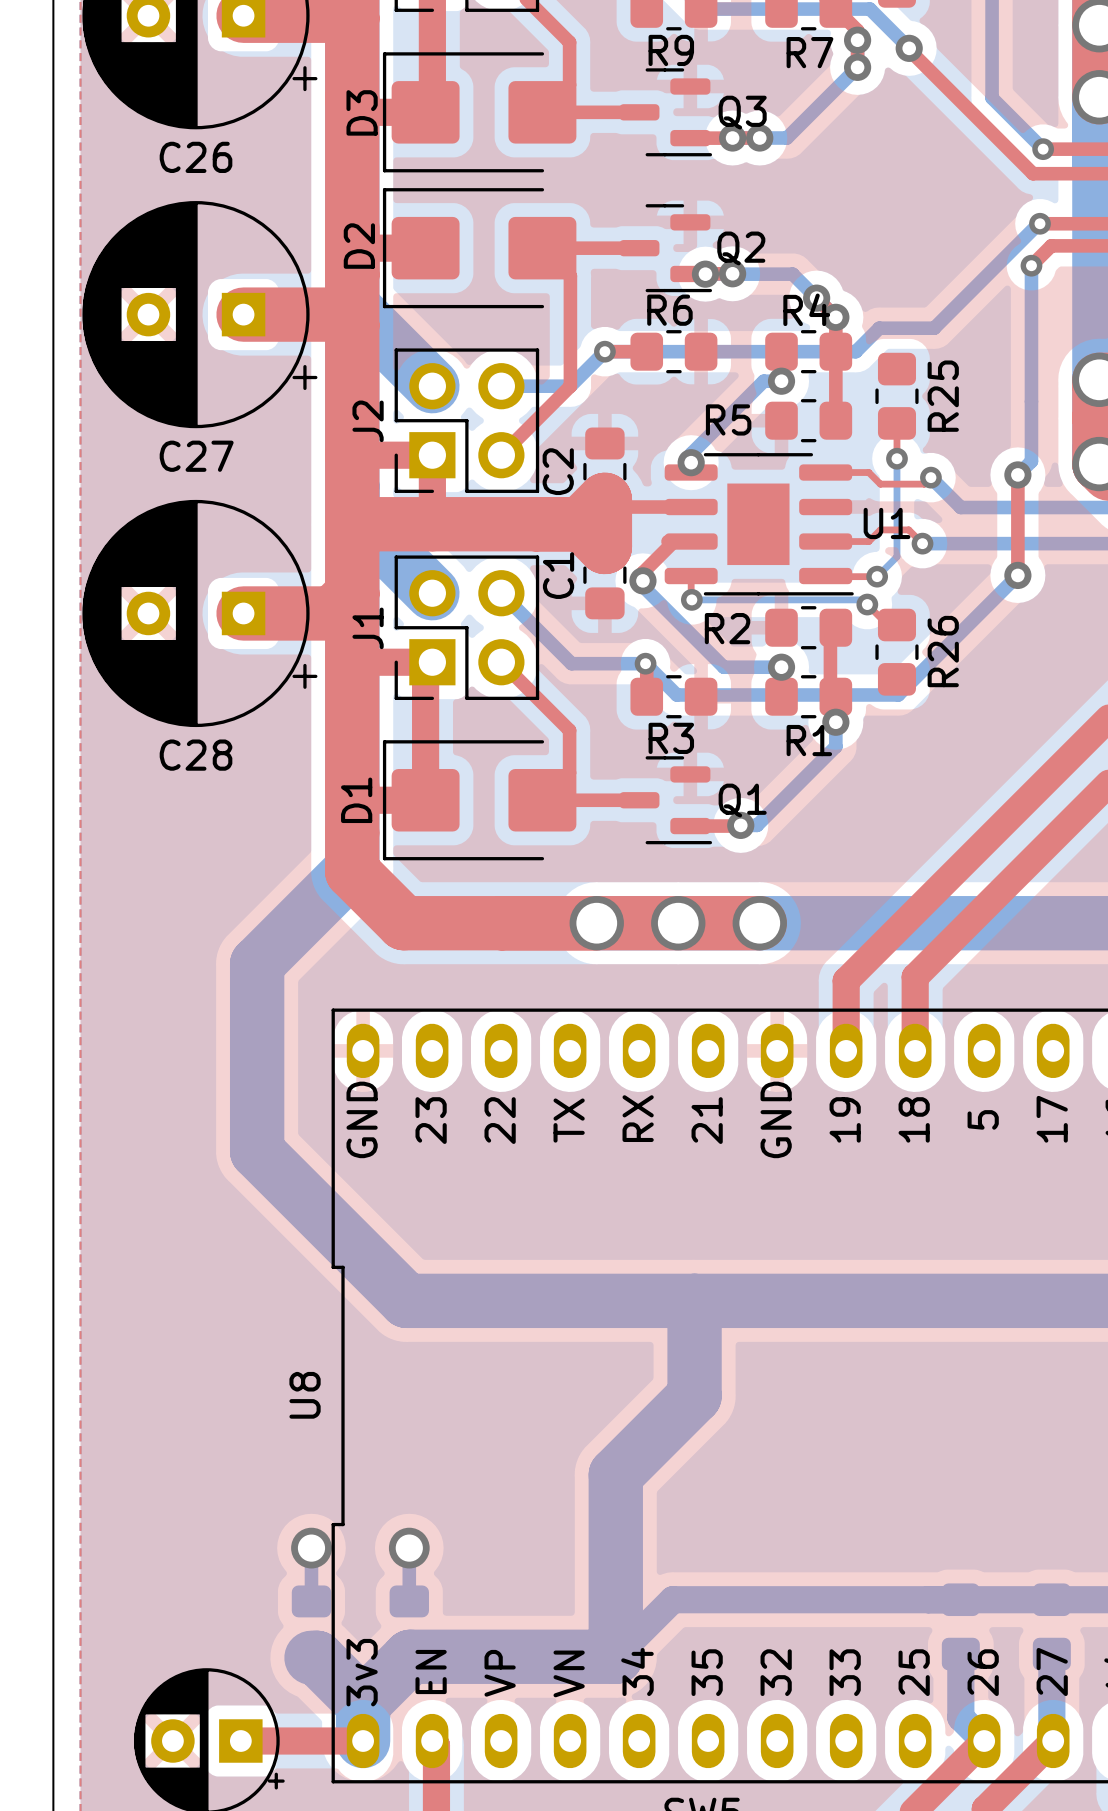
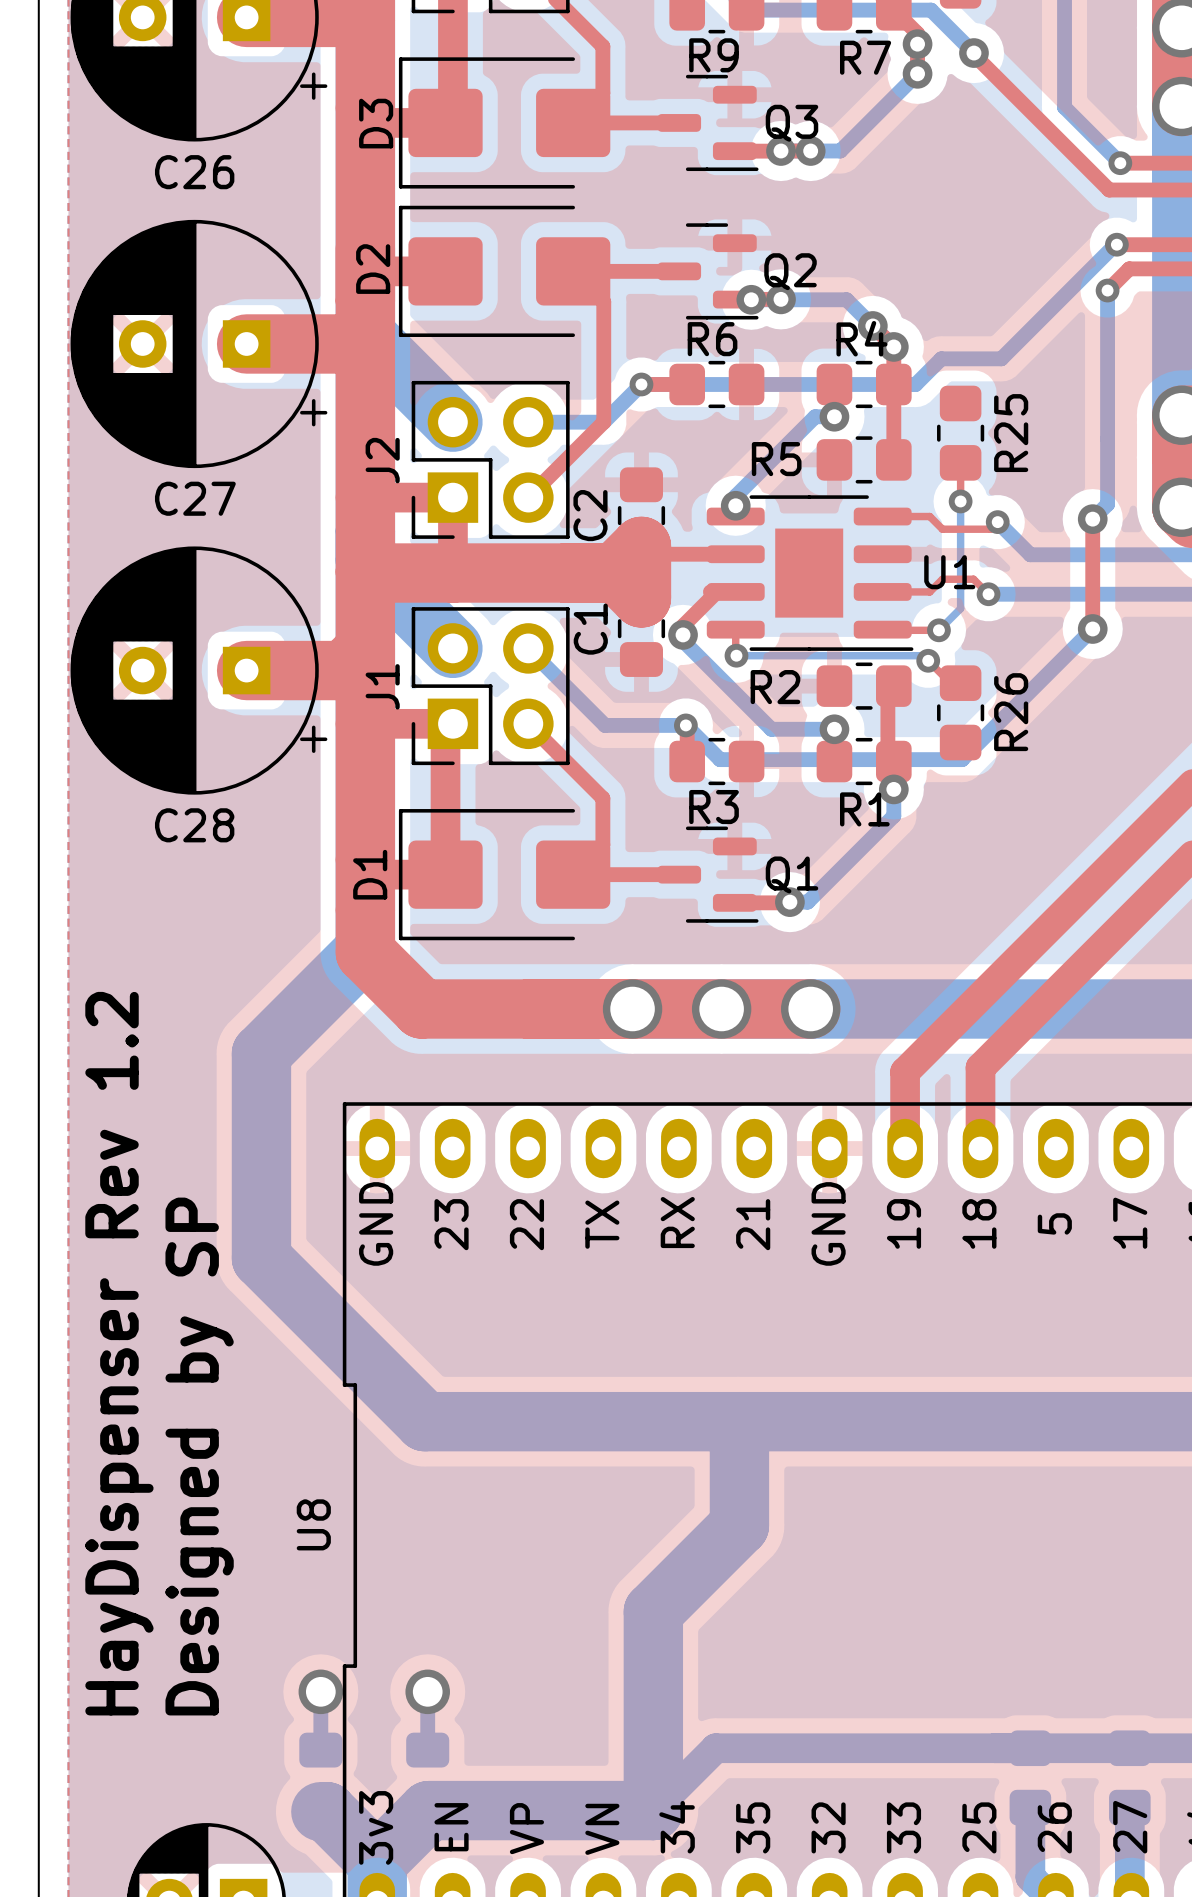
text: none -> HayDispenser Rev 1.2 (119, 1353)
text: none -> Designed by SP (199, 1456)

